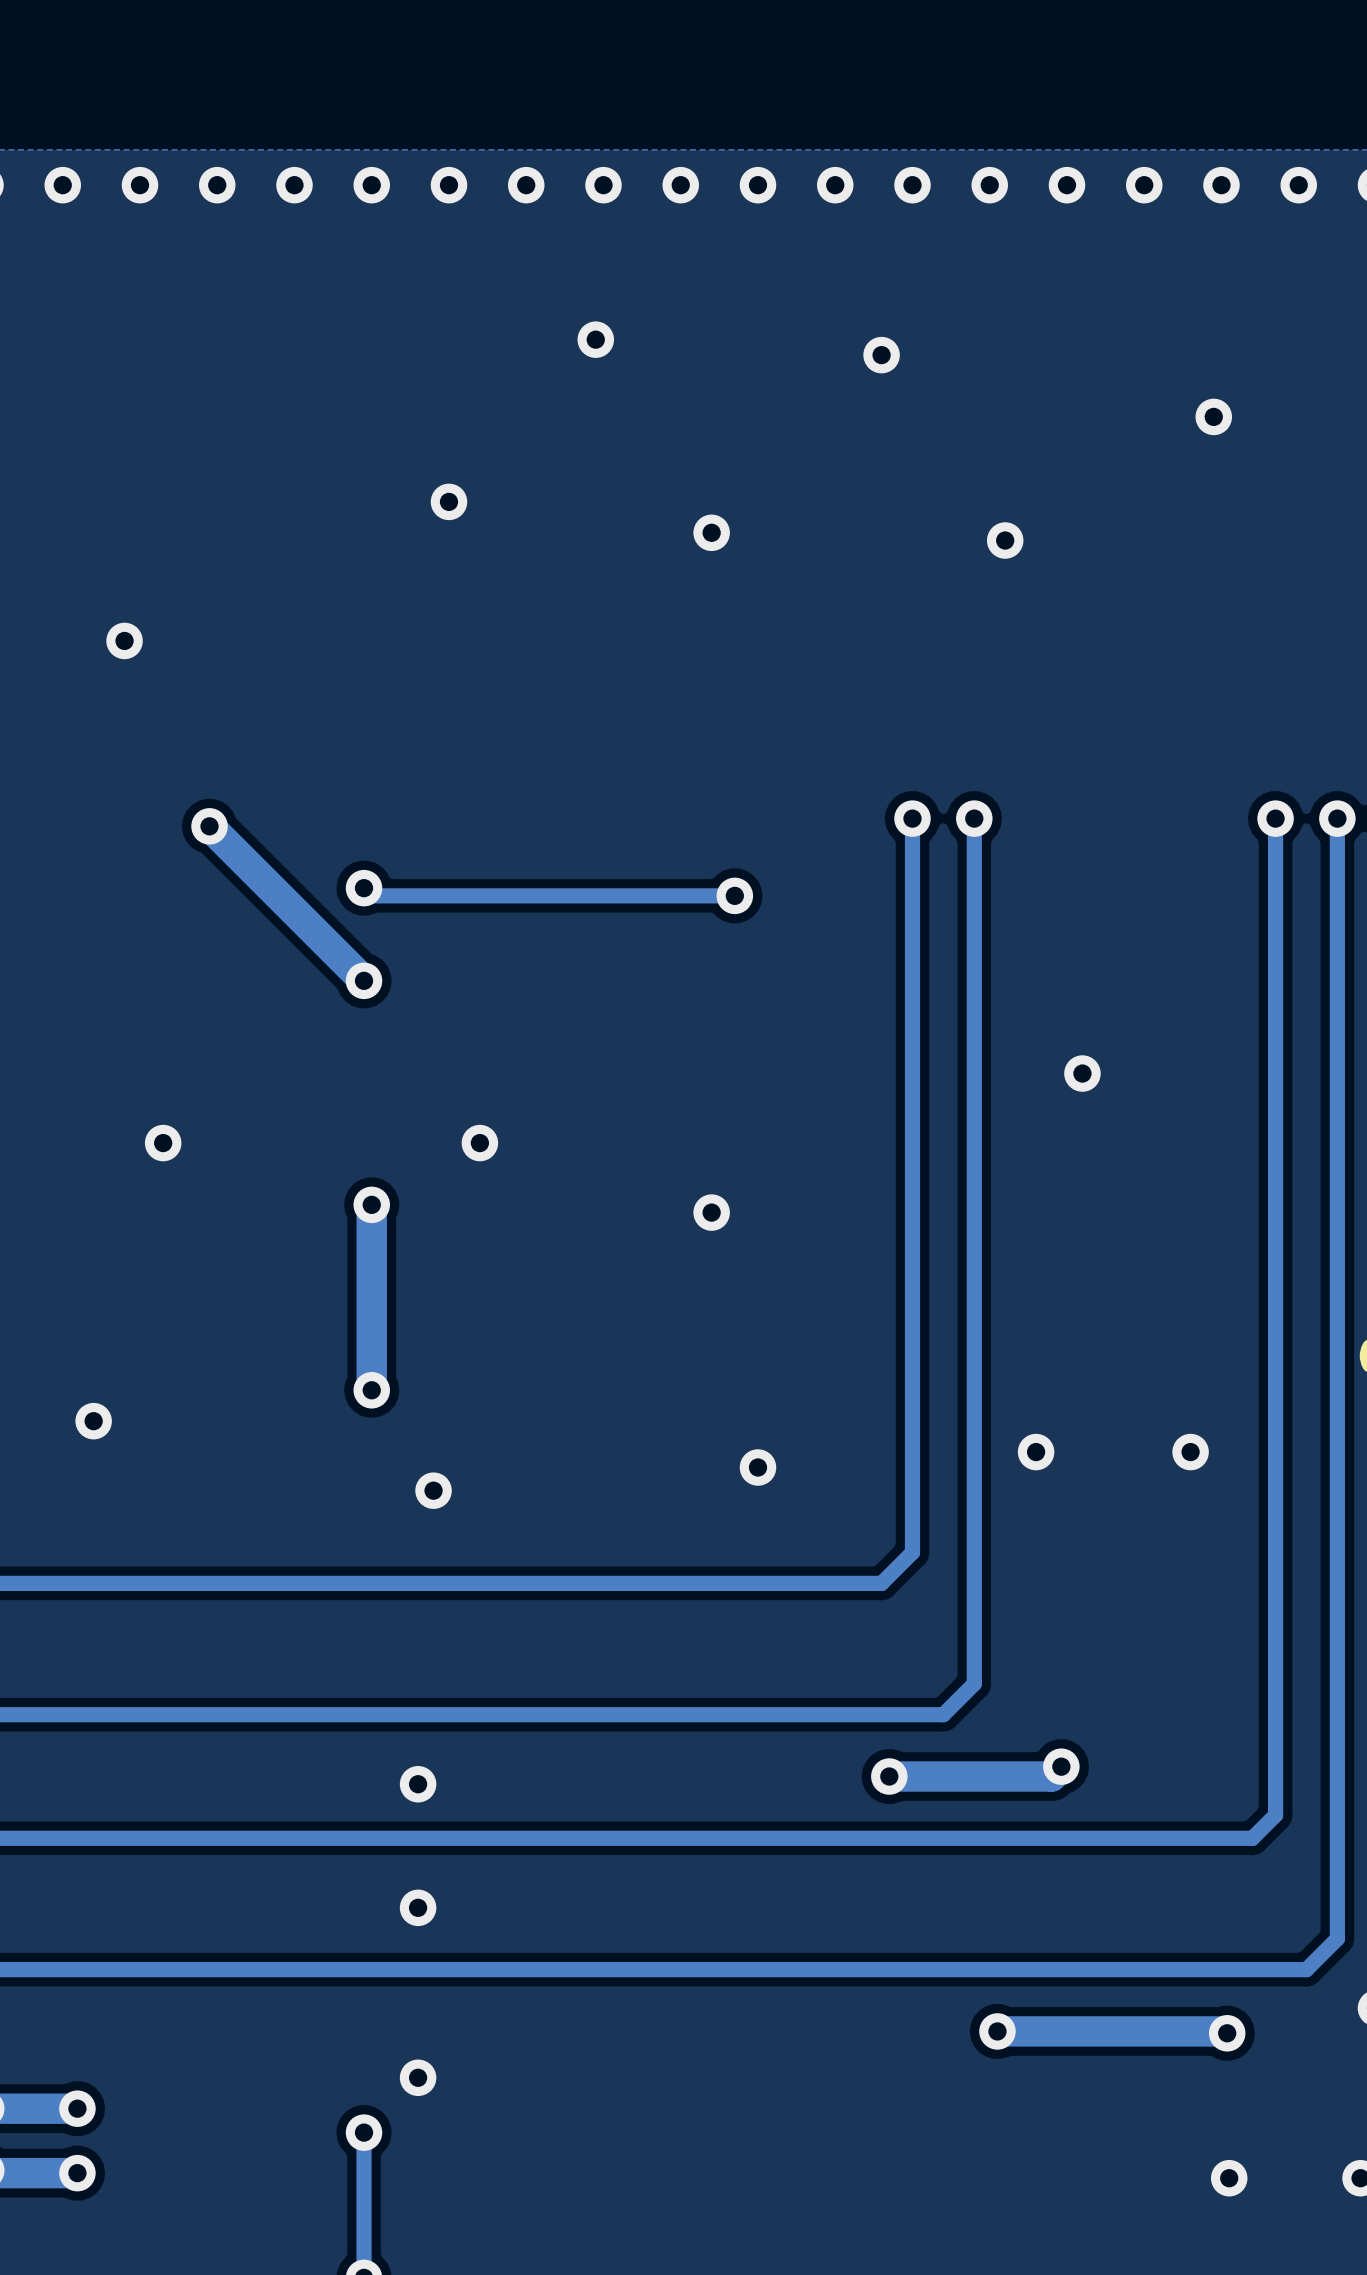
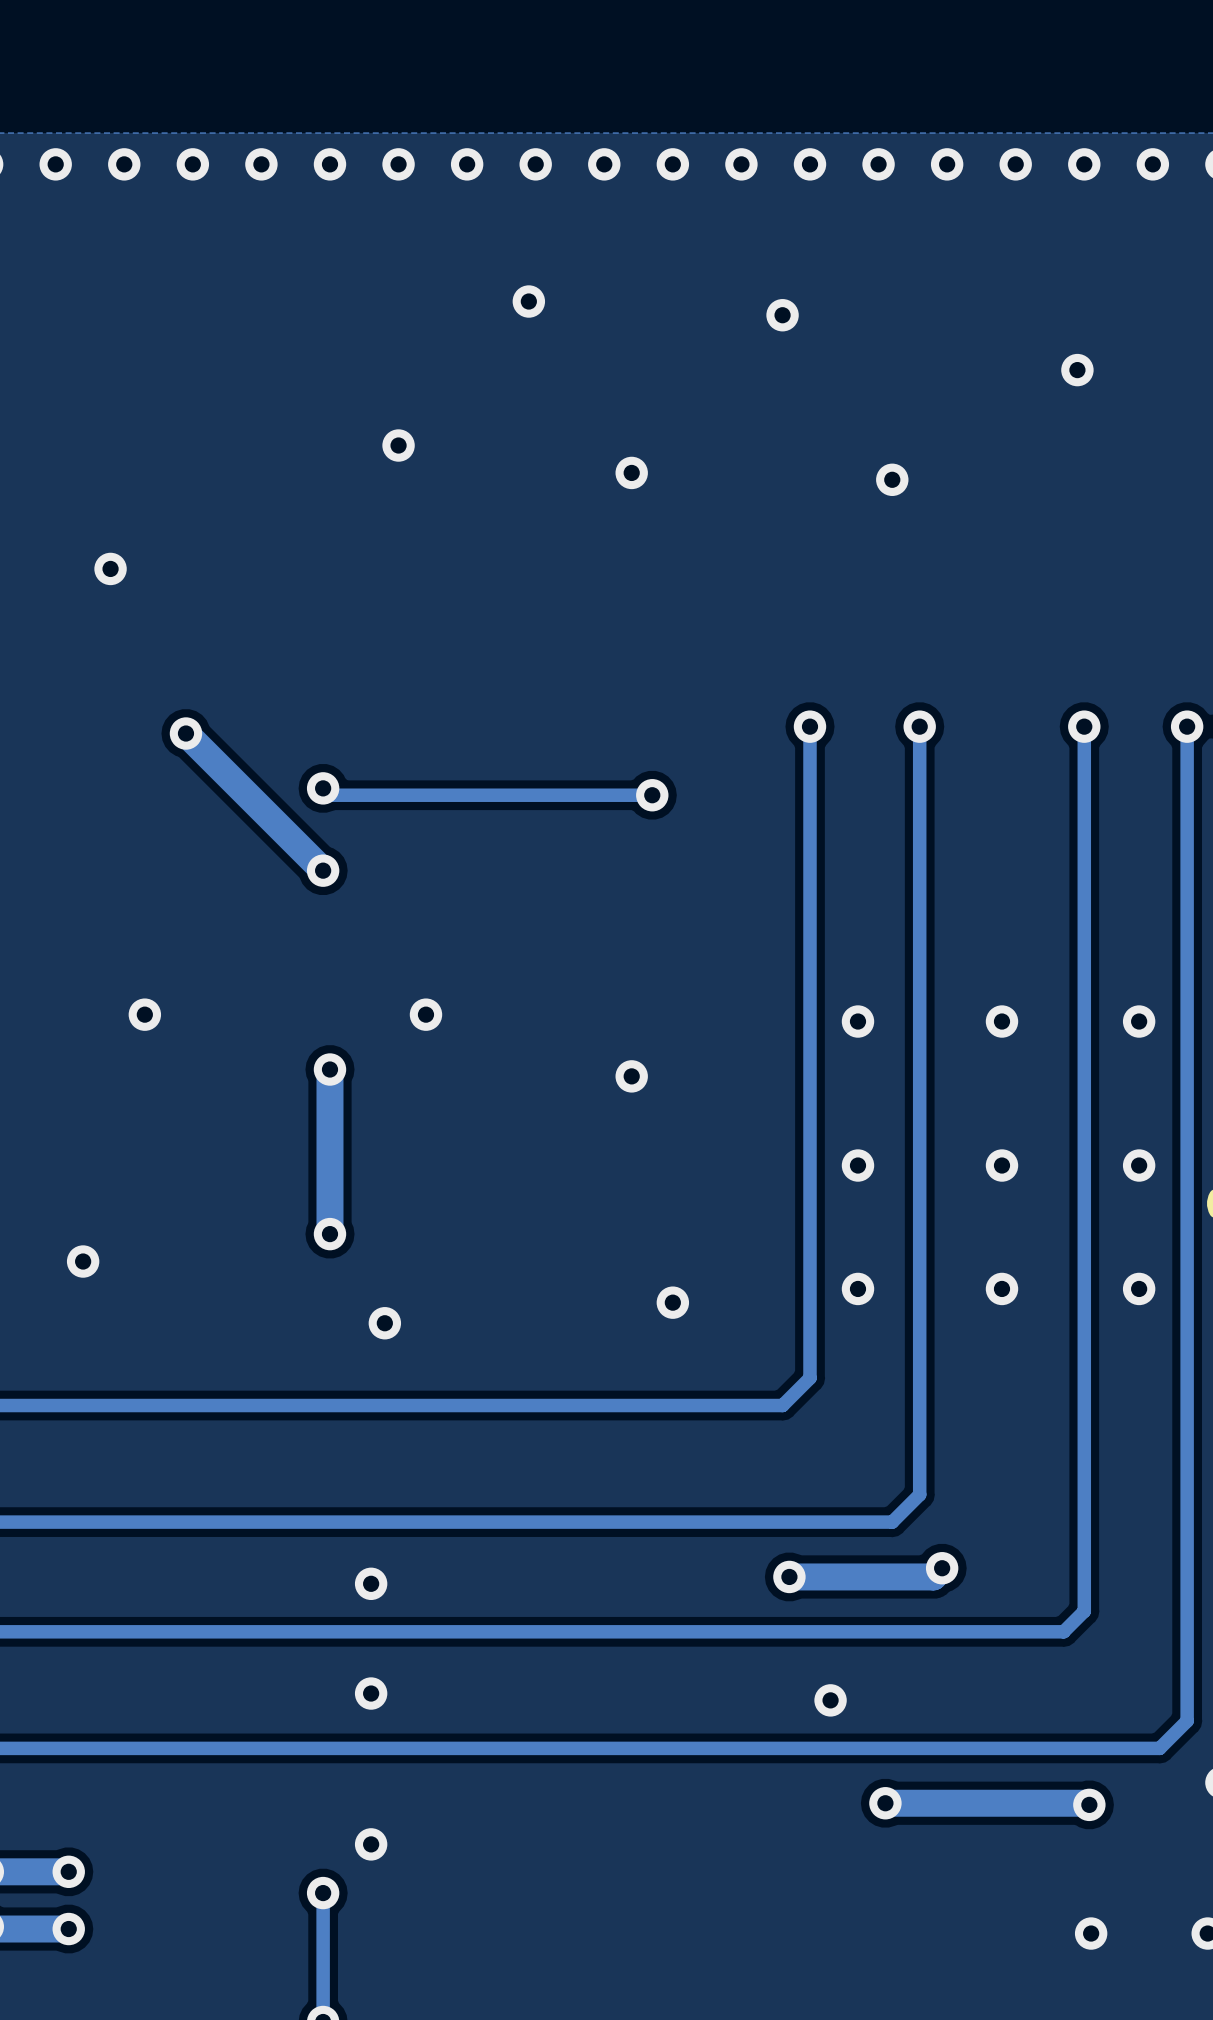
track: (974, 818) (974, 1683) (943, 1714) -> (919, 726) (919, 1494) (892, 1522) (837, 1522)
via position: (974, 818) -> (919, 726)
track: (1275, 818) (1275, 1815) (1252, 1838) (1198, 1838) -> (1084, 726) (1084, 1611) (1063, 1631)
via position: (1275, 818) -> (1084, 726)
via: (1082, 1073) -> none
via: none -> (857, 1021)
via: none -> (1001, 1021)
via: none -> (1139, 1021)
via: none -> (857, 1165)
via: none -> (1001, 1165)
via: none -> (1139, 1165)
via: none -> (857, 1288)
via: (1036, 1452) -> none
via: none -> (1001, 1288)
via: (1190, 1452) -> none
via: none -> (1139, 1288)
via: none -> (830, 1700)

